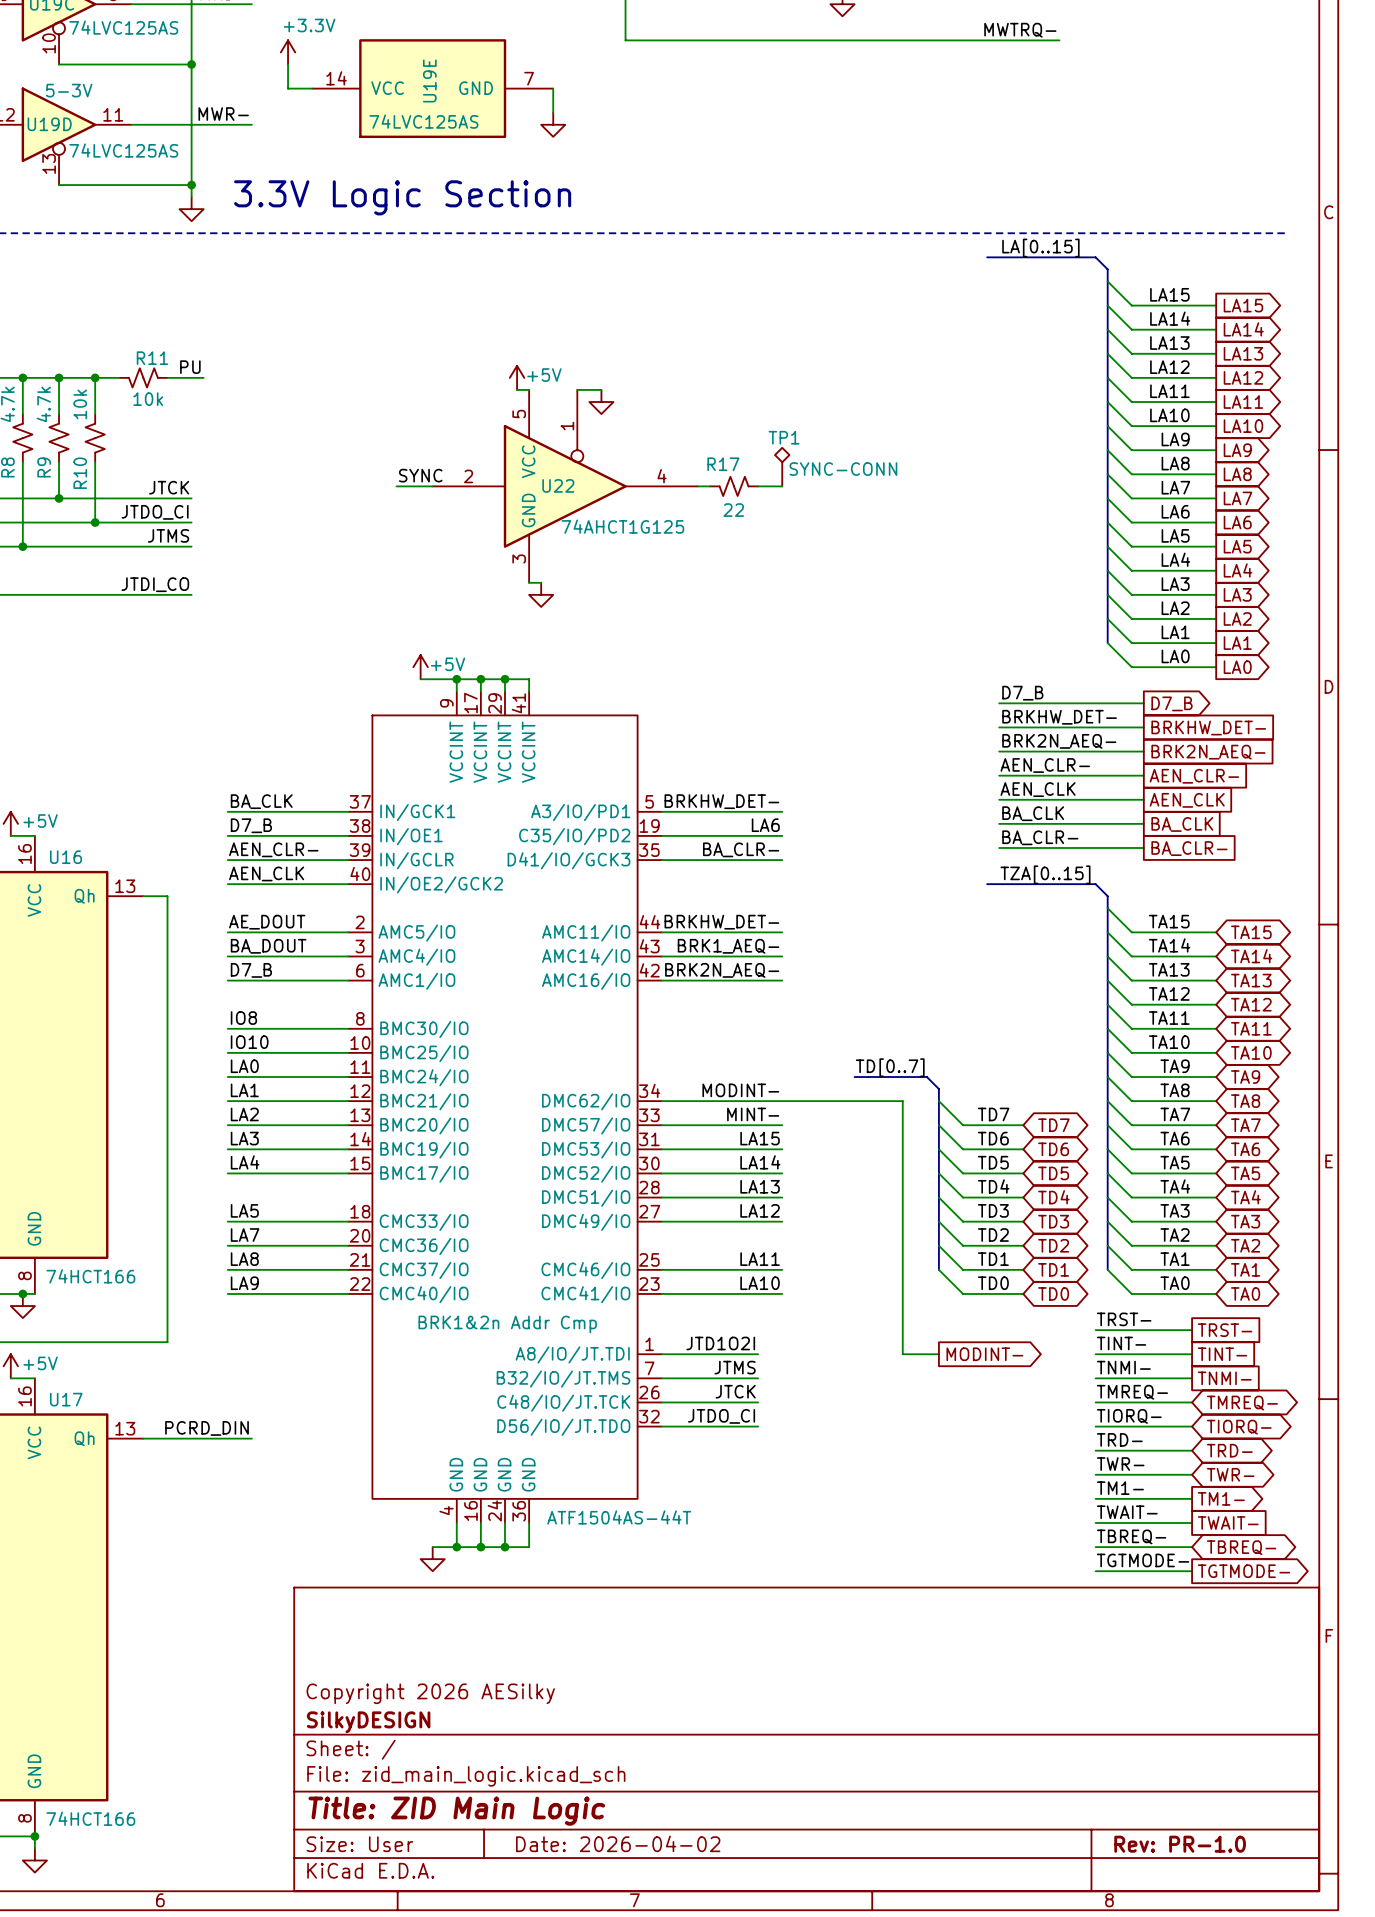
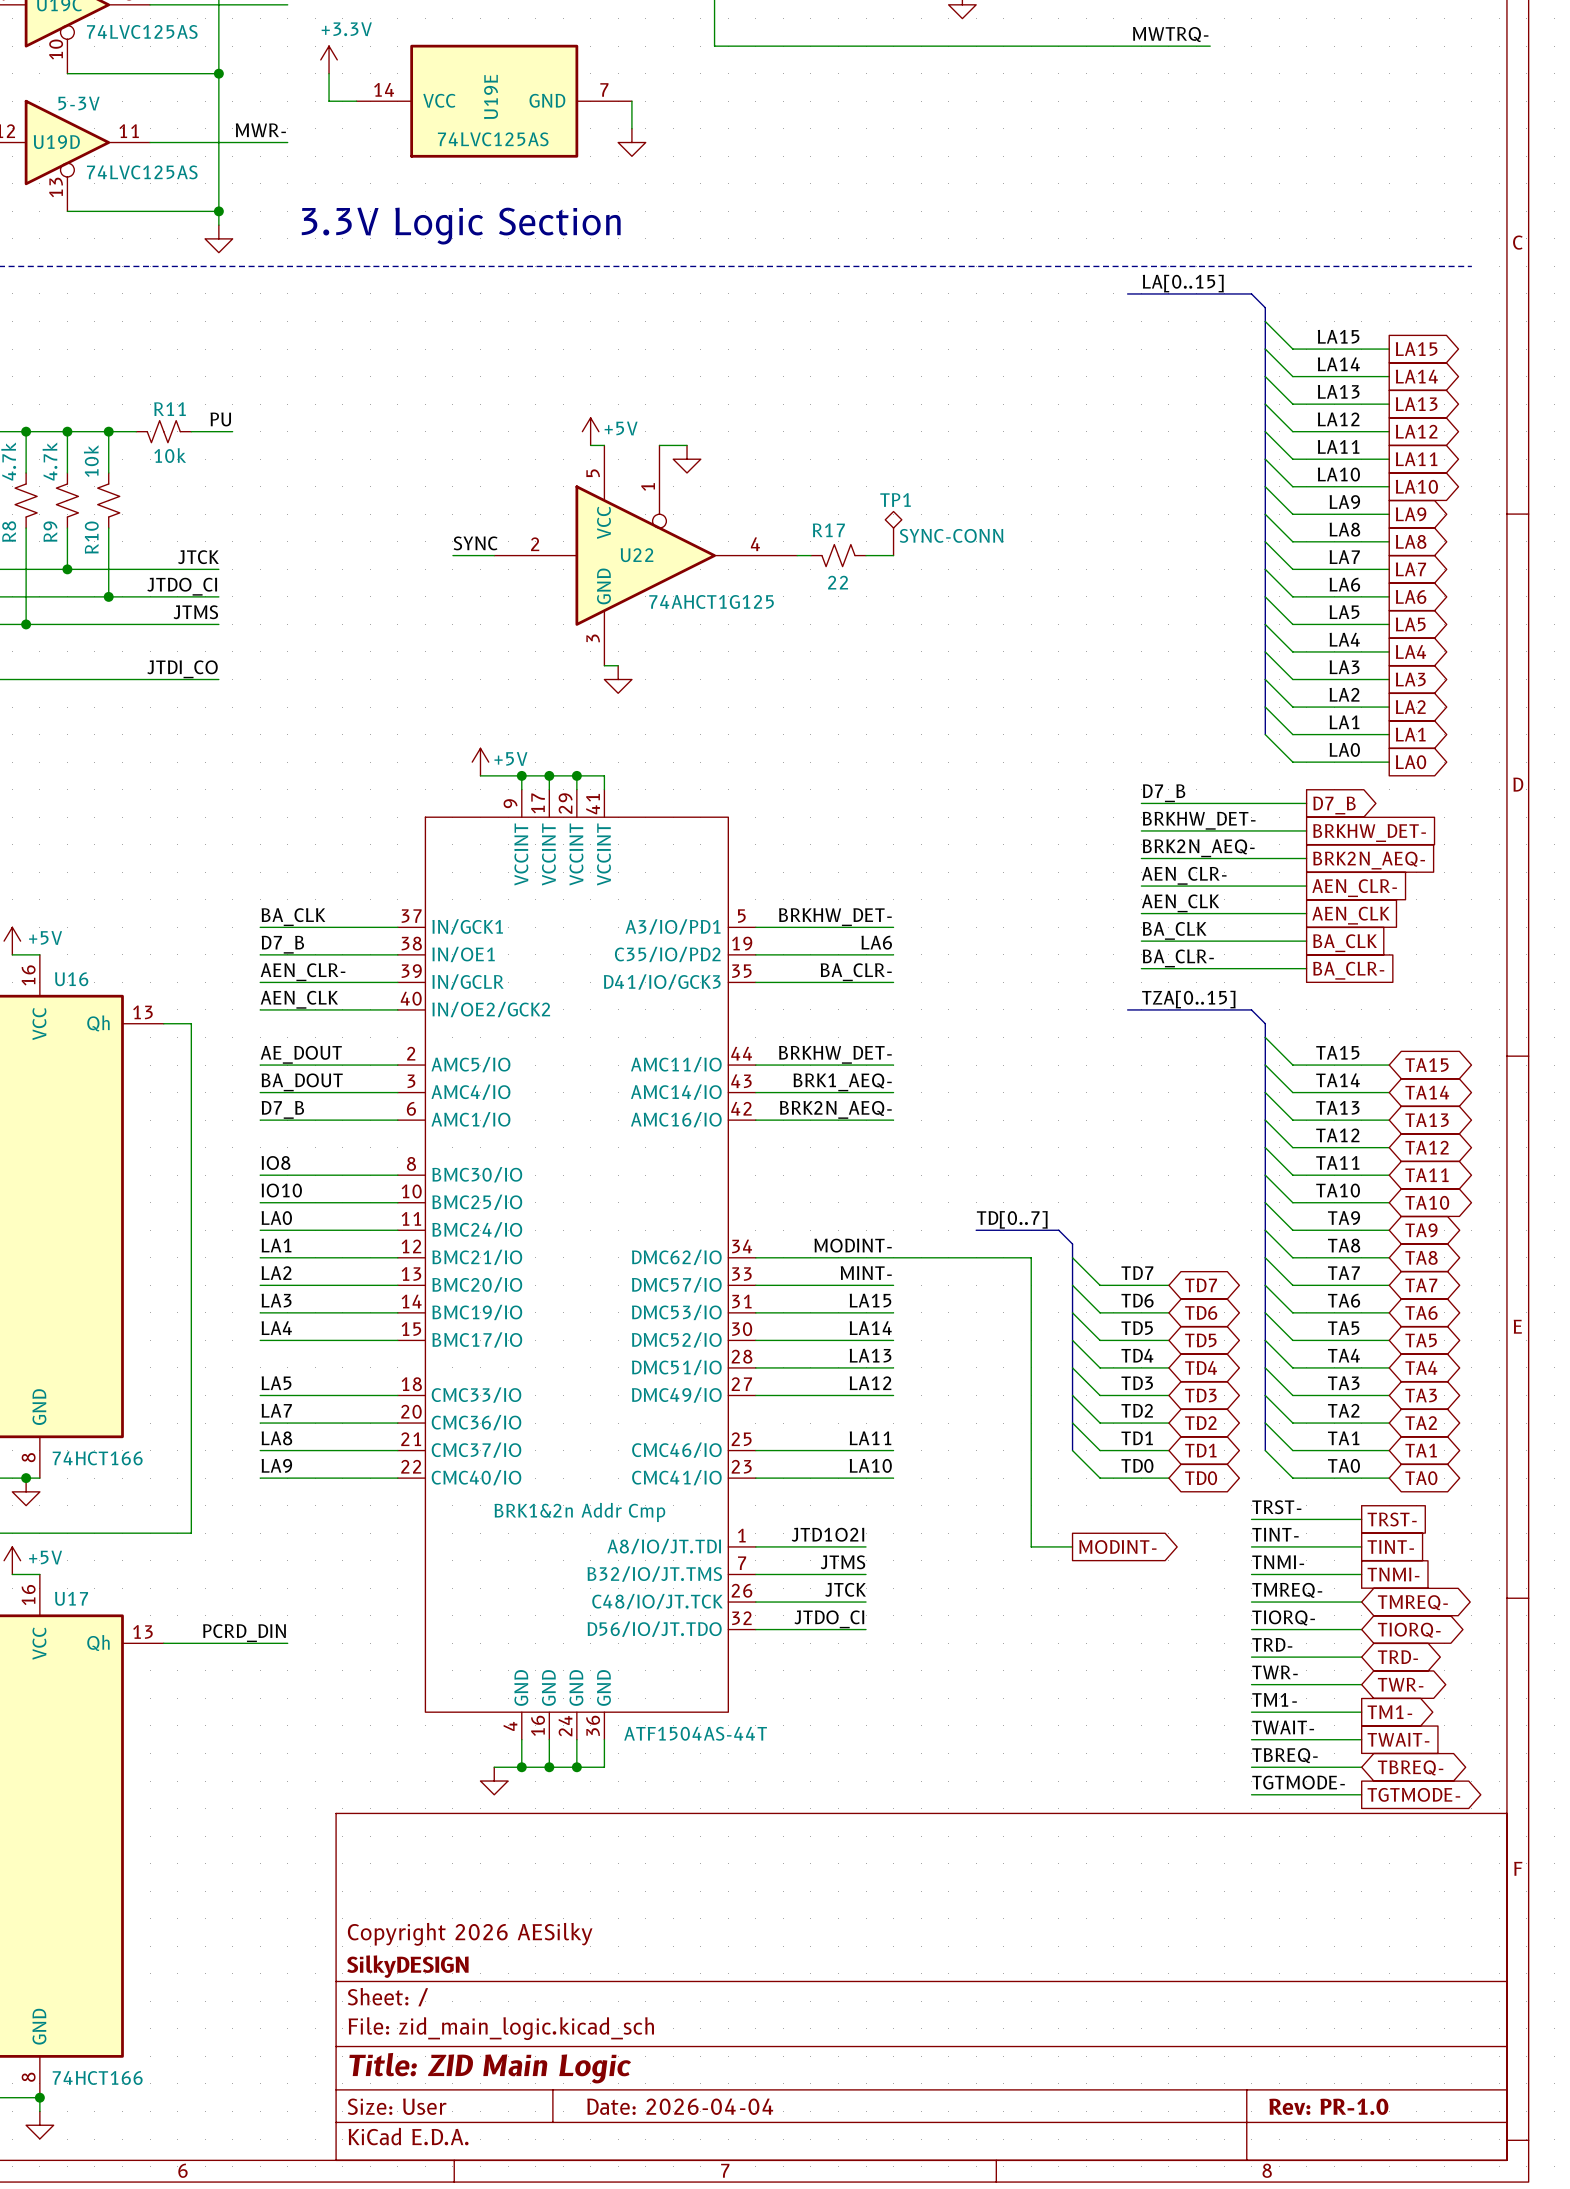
title block: Date: 2026-04-02 (618, 1843) -> Date: 2026-04-04 (680, 2106)

